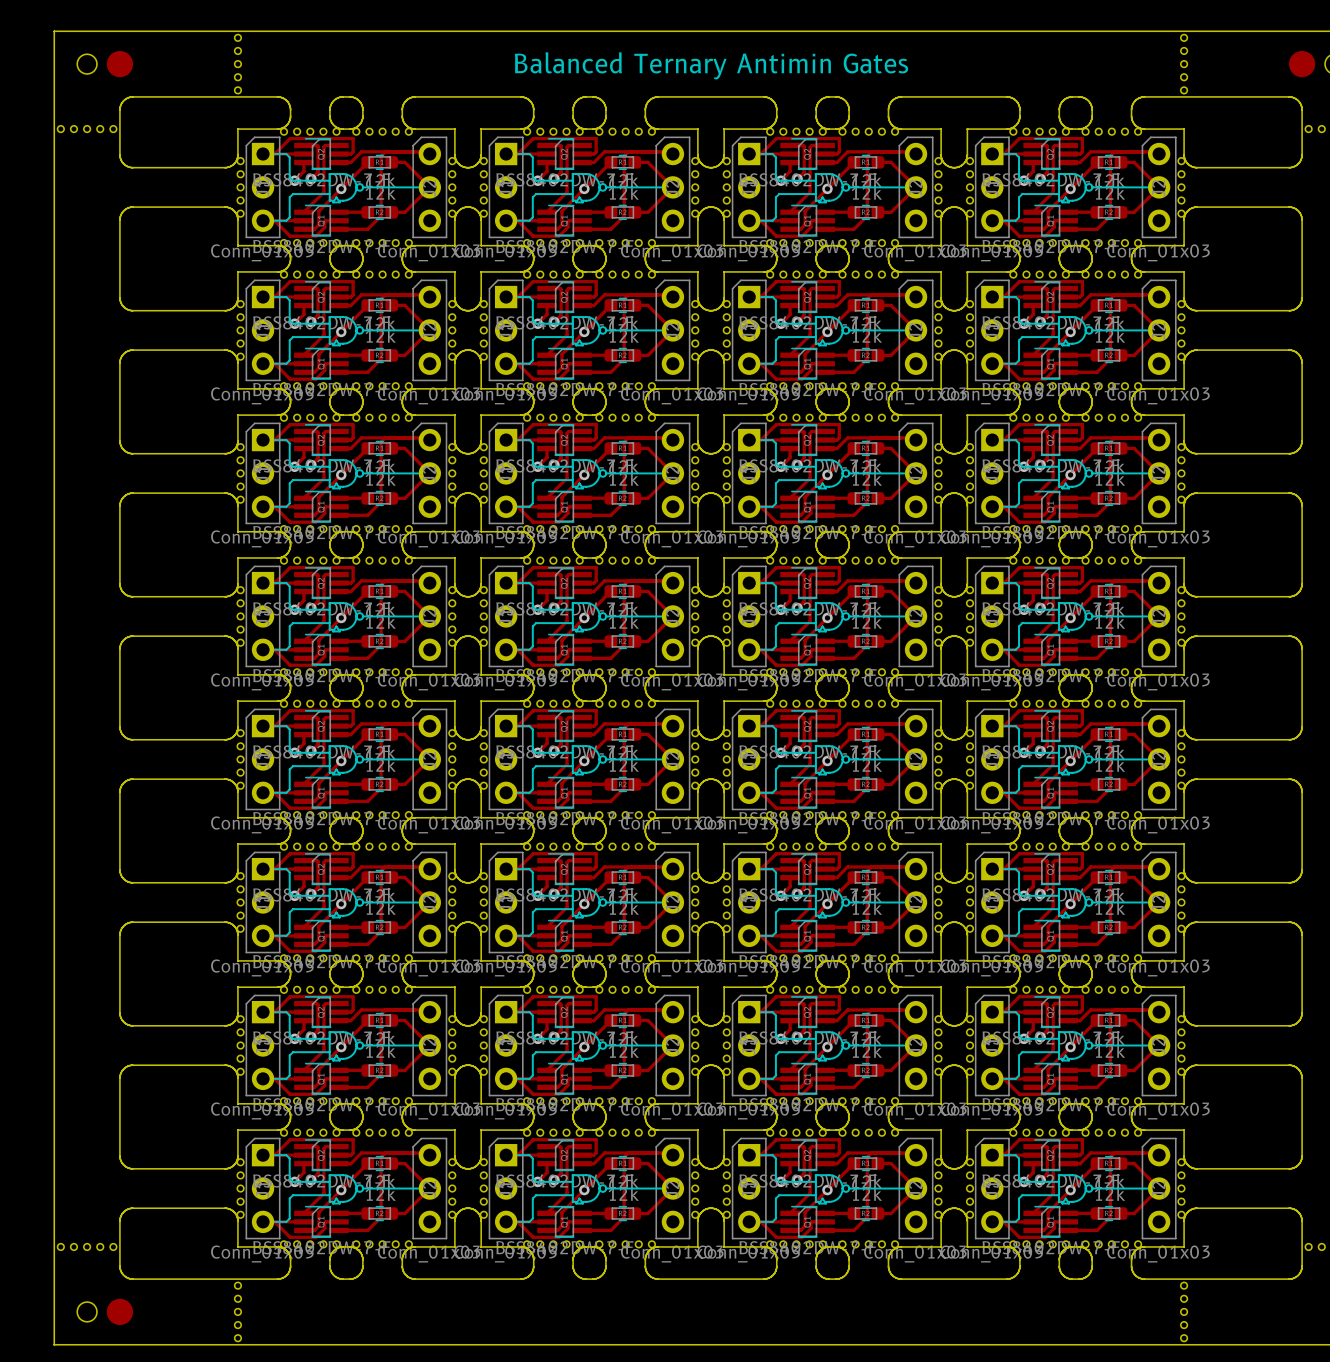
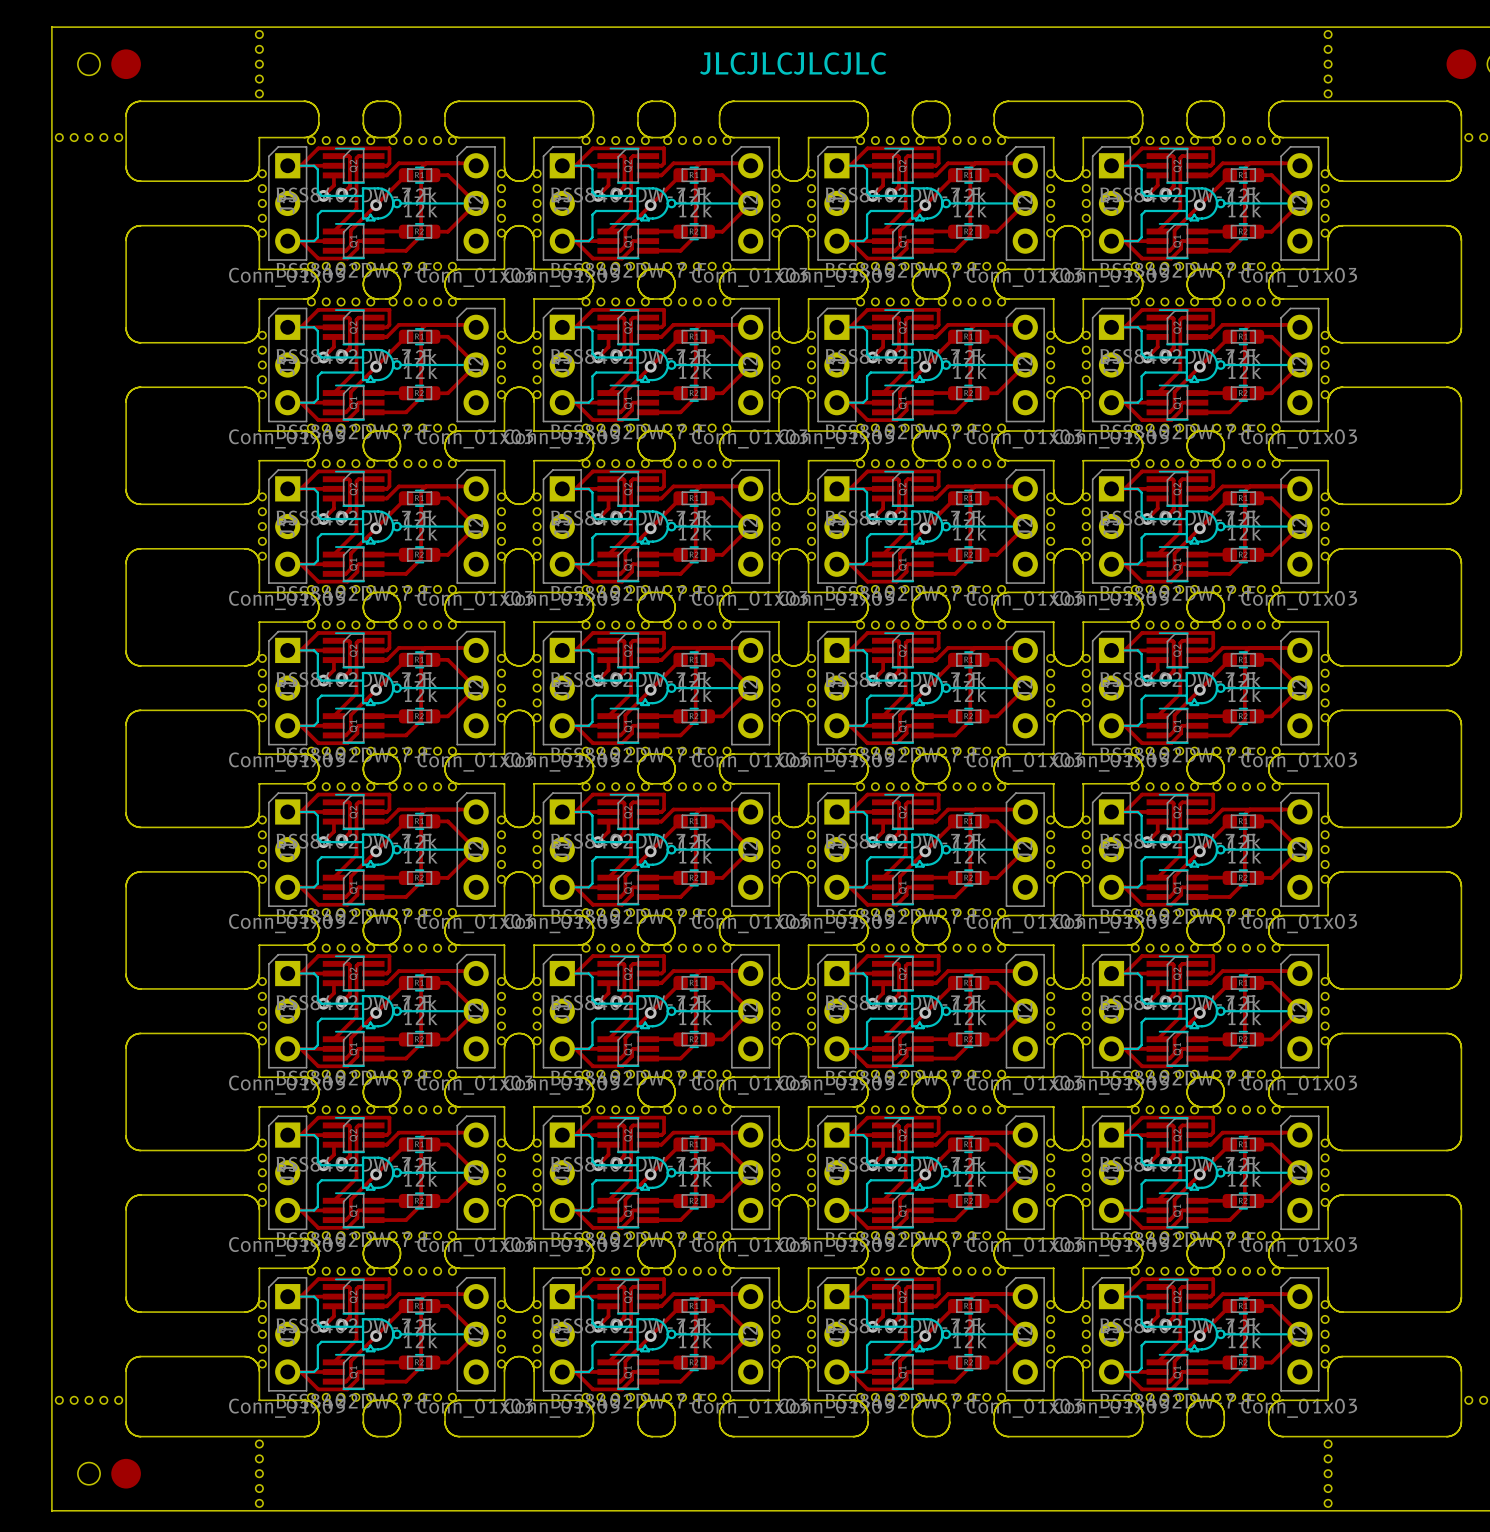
text: Balanced Ternary Antimin Gates (711, 65) -> JLCJLCJLCJLC (793, 63)

